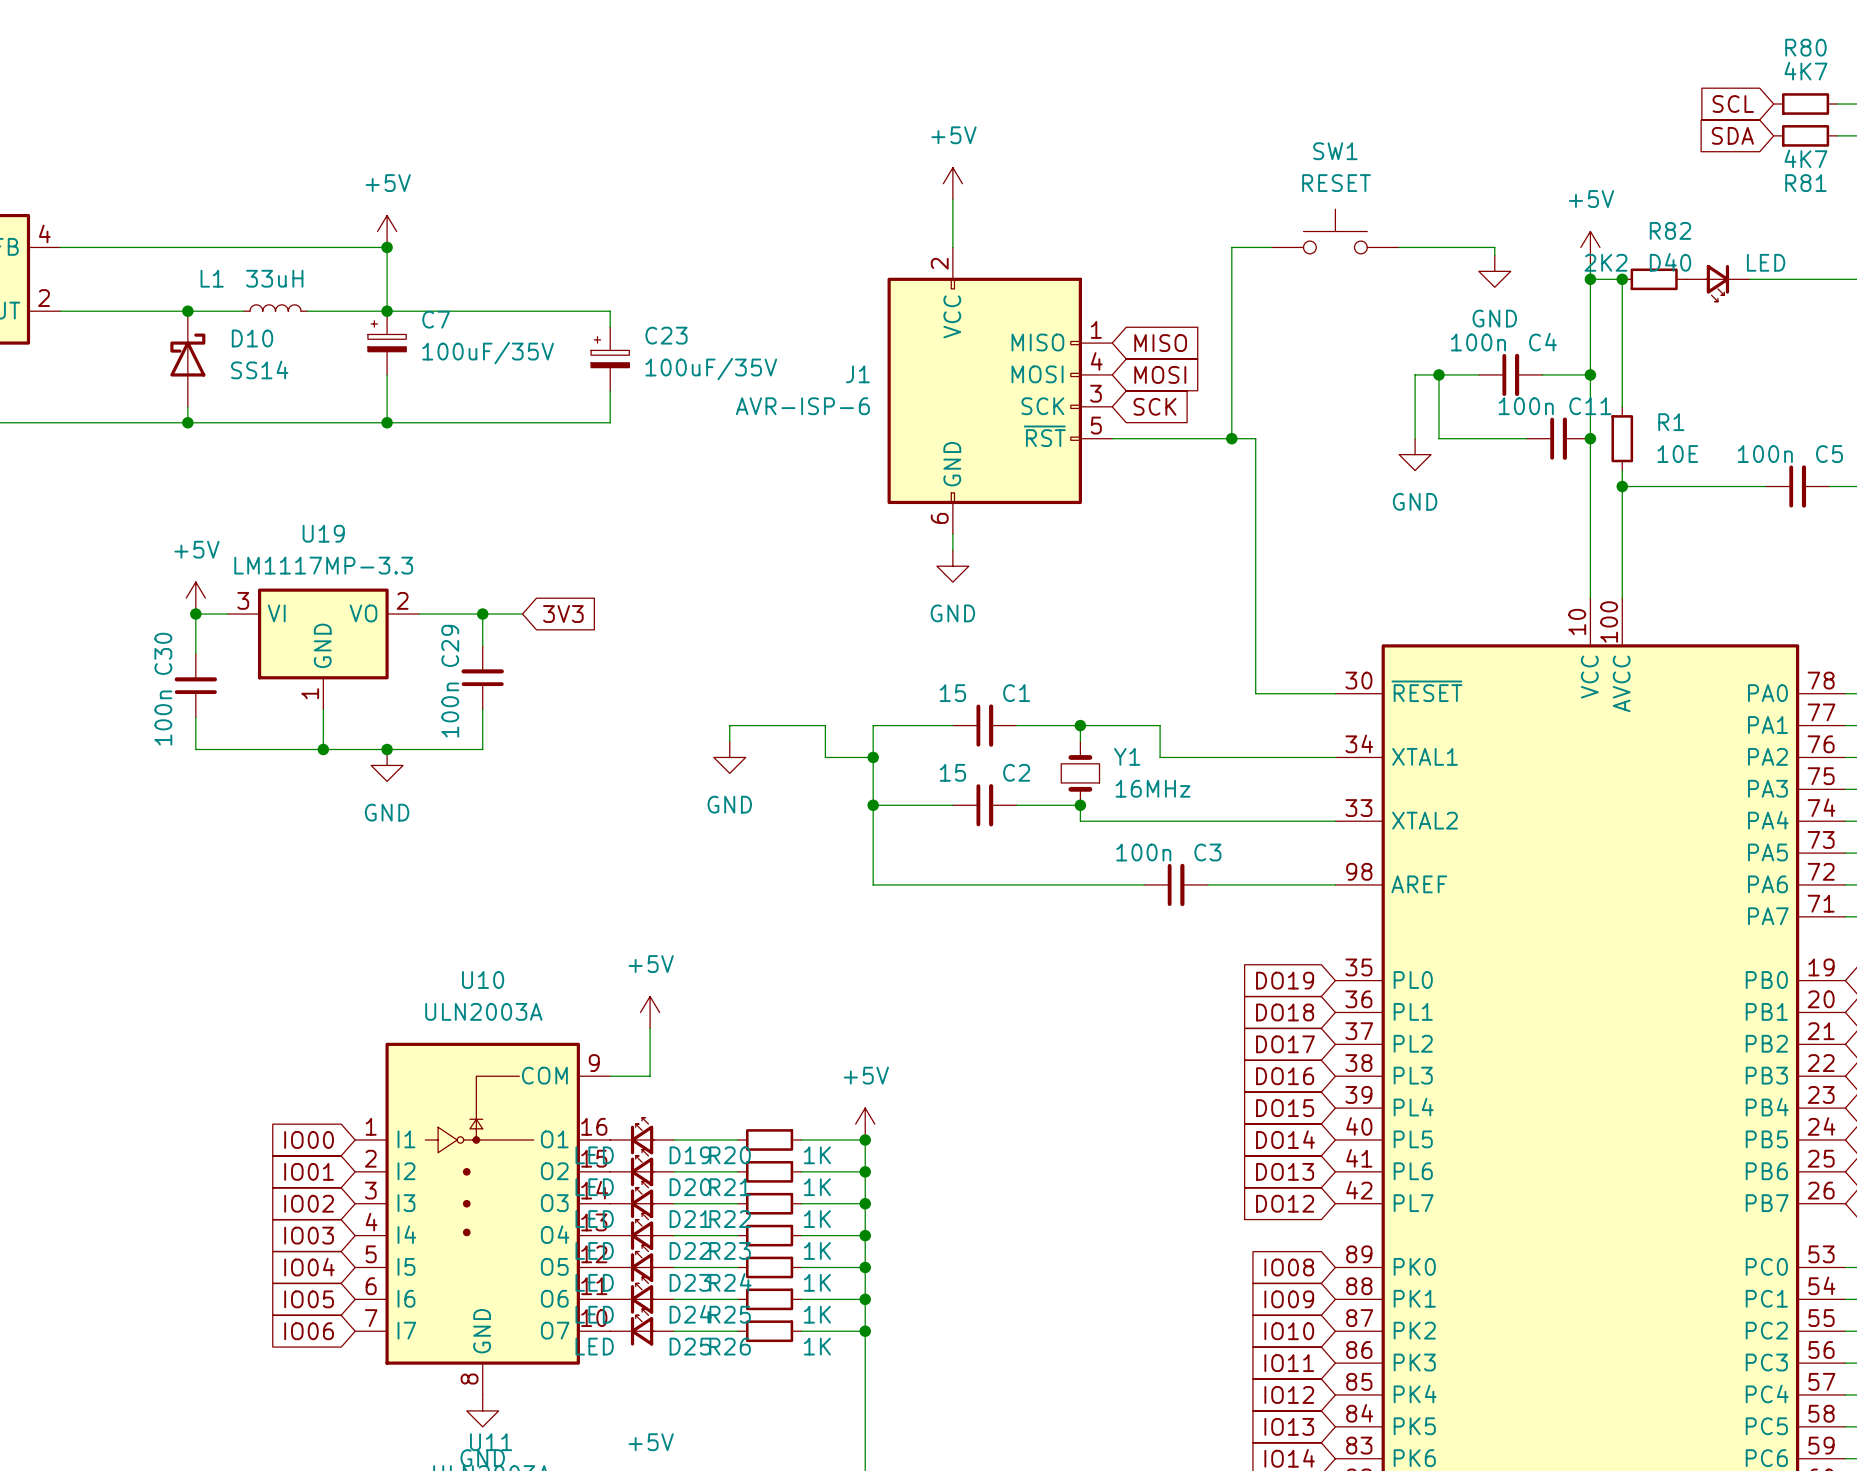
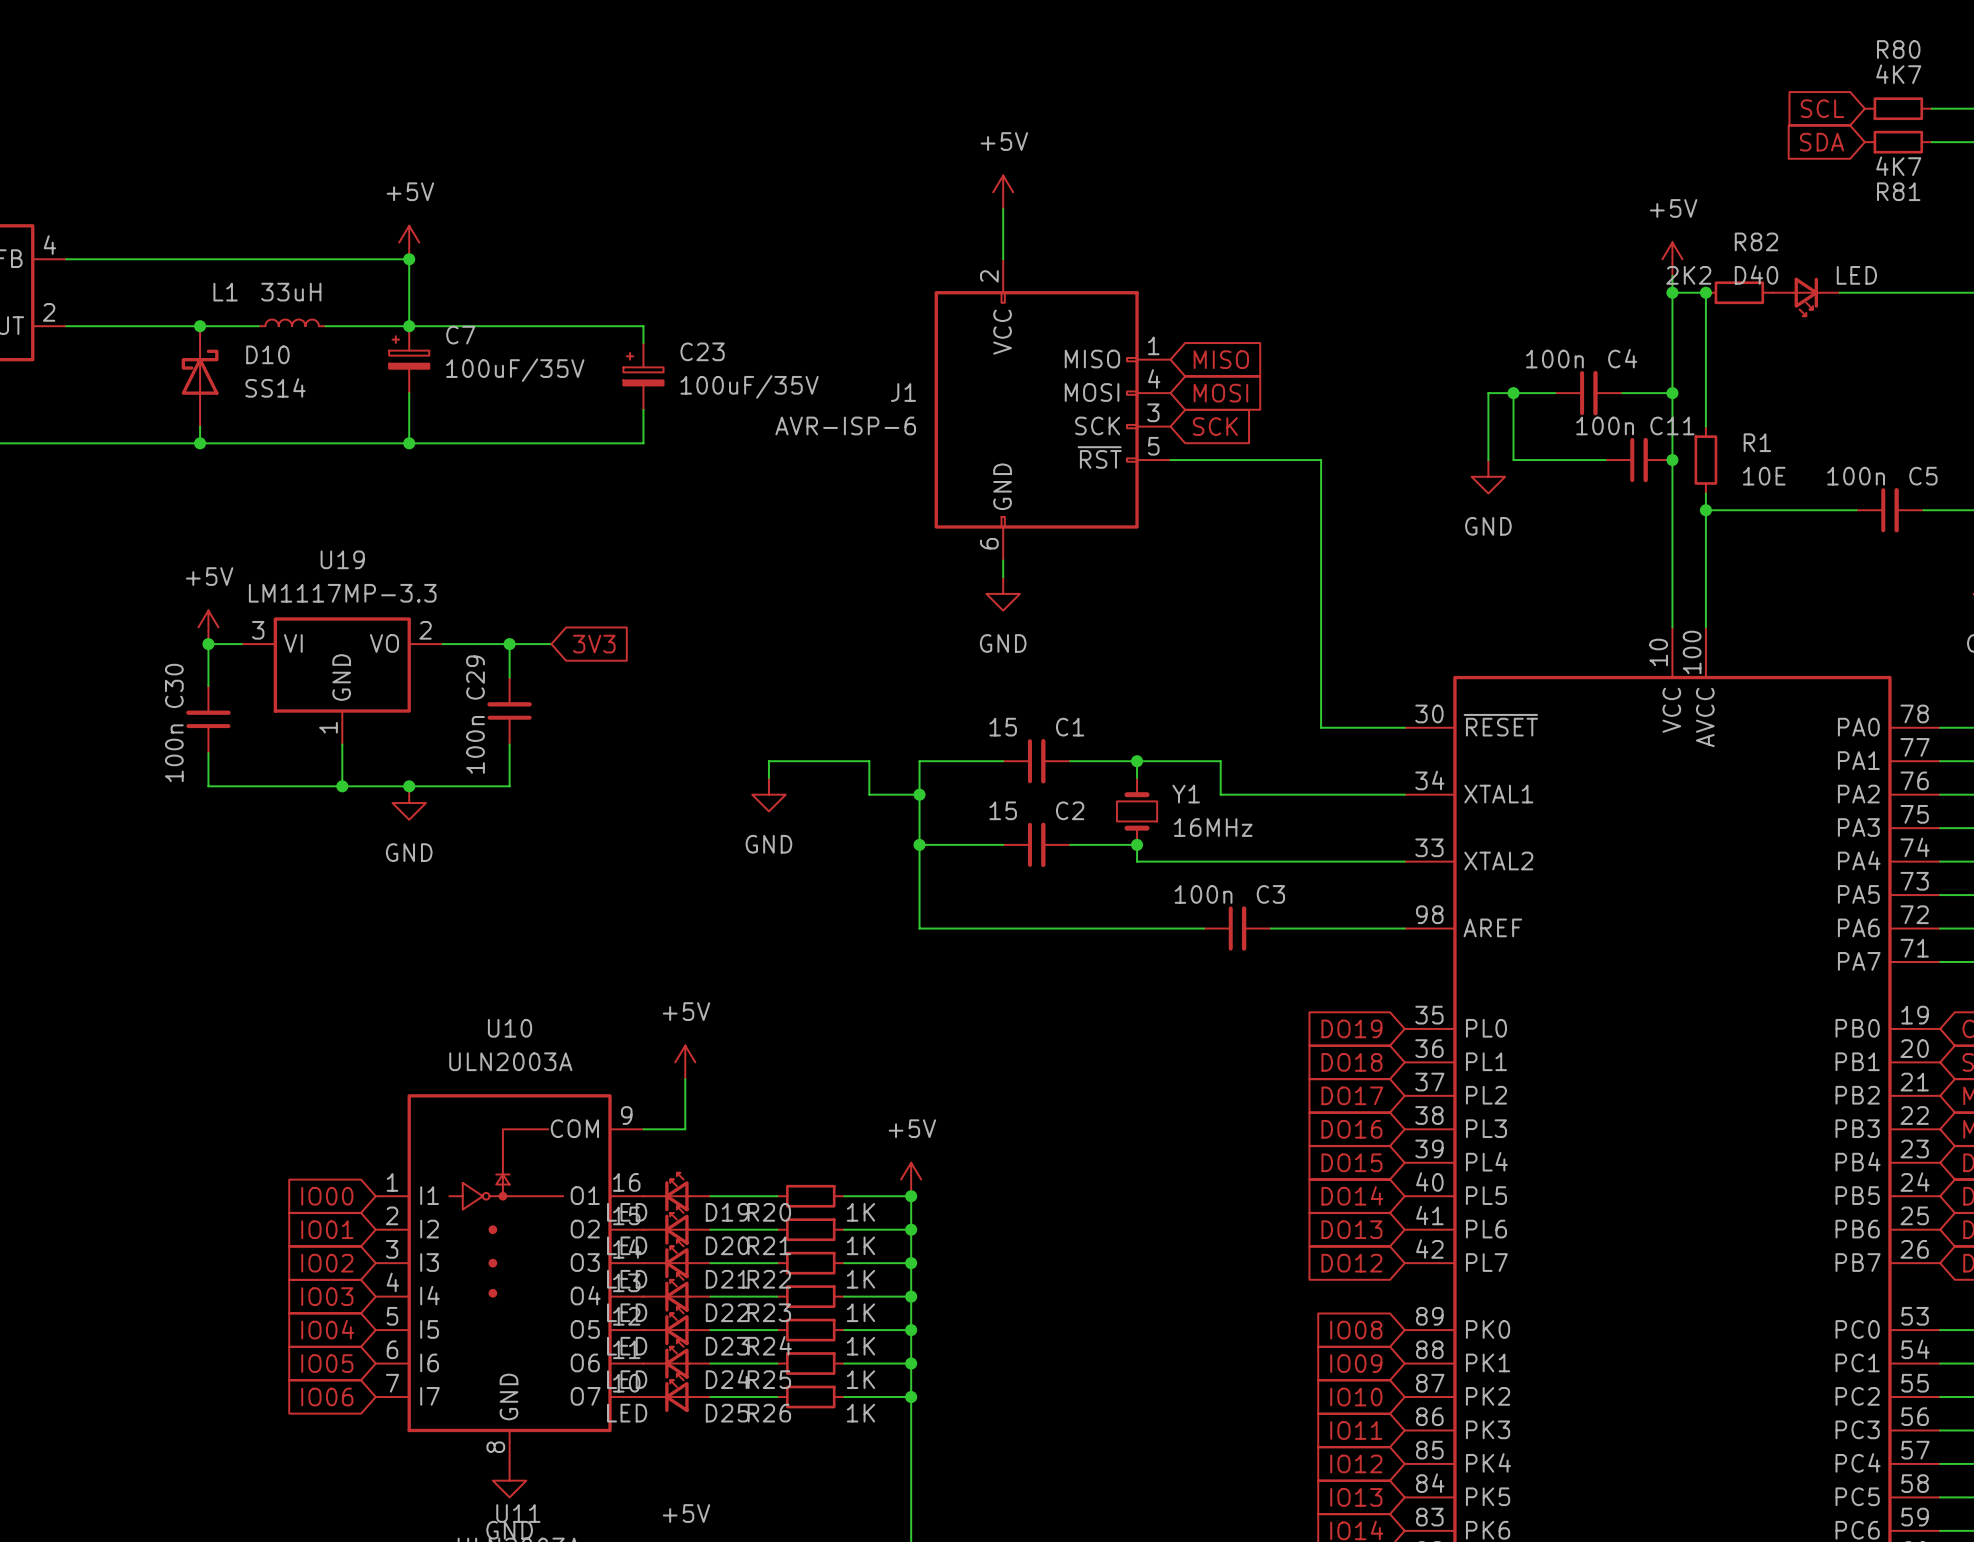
SW1: RESET (1335, 231) -> none
wire: (1271, 247) (1231, 247) (1231, 438) -> none
wire: (1399, 247) (1494, 247) (1494, 255) -> none
power symbol: GND (1494, 271) -> none
junction: (1231, 438) -> none

